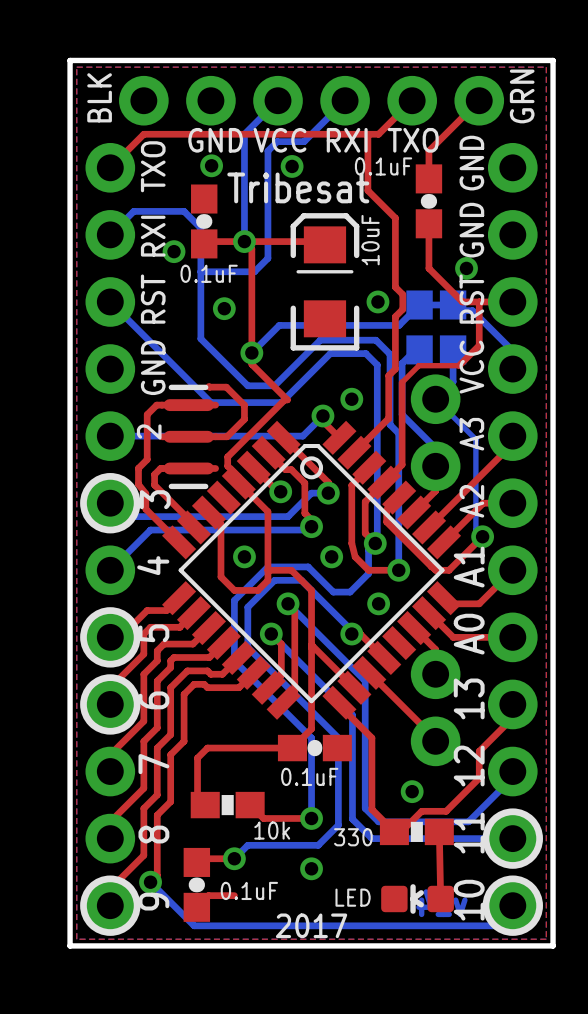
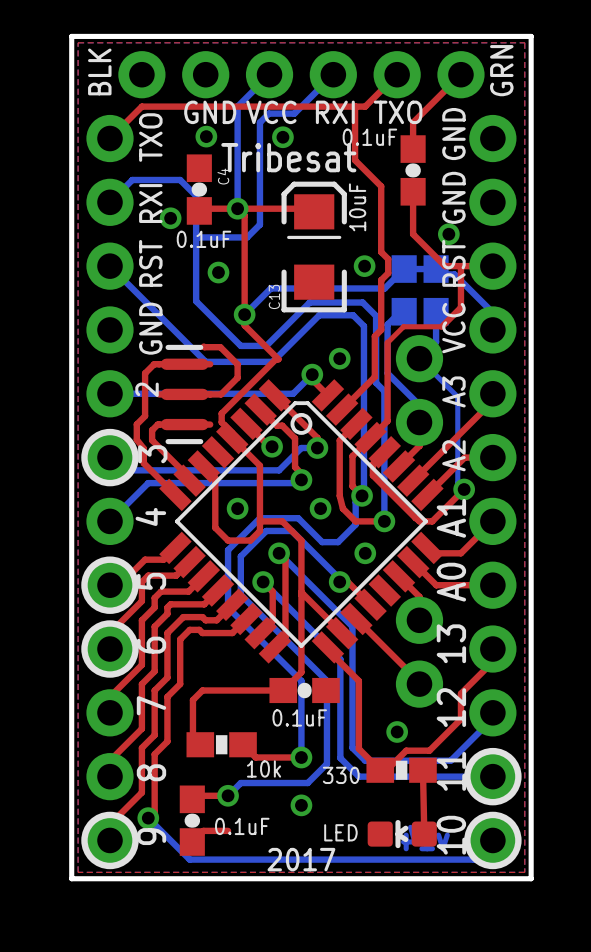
C4 name: none -> C4 (223, 176)
C13 name: none -> C13 (274, 296)

